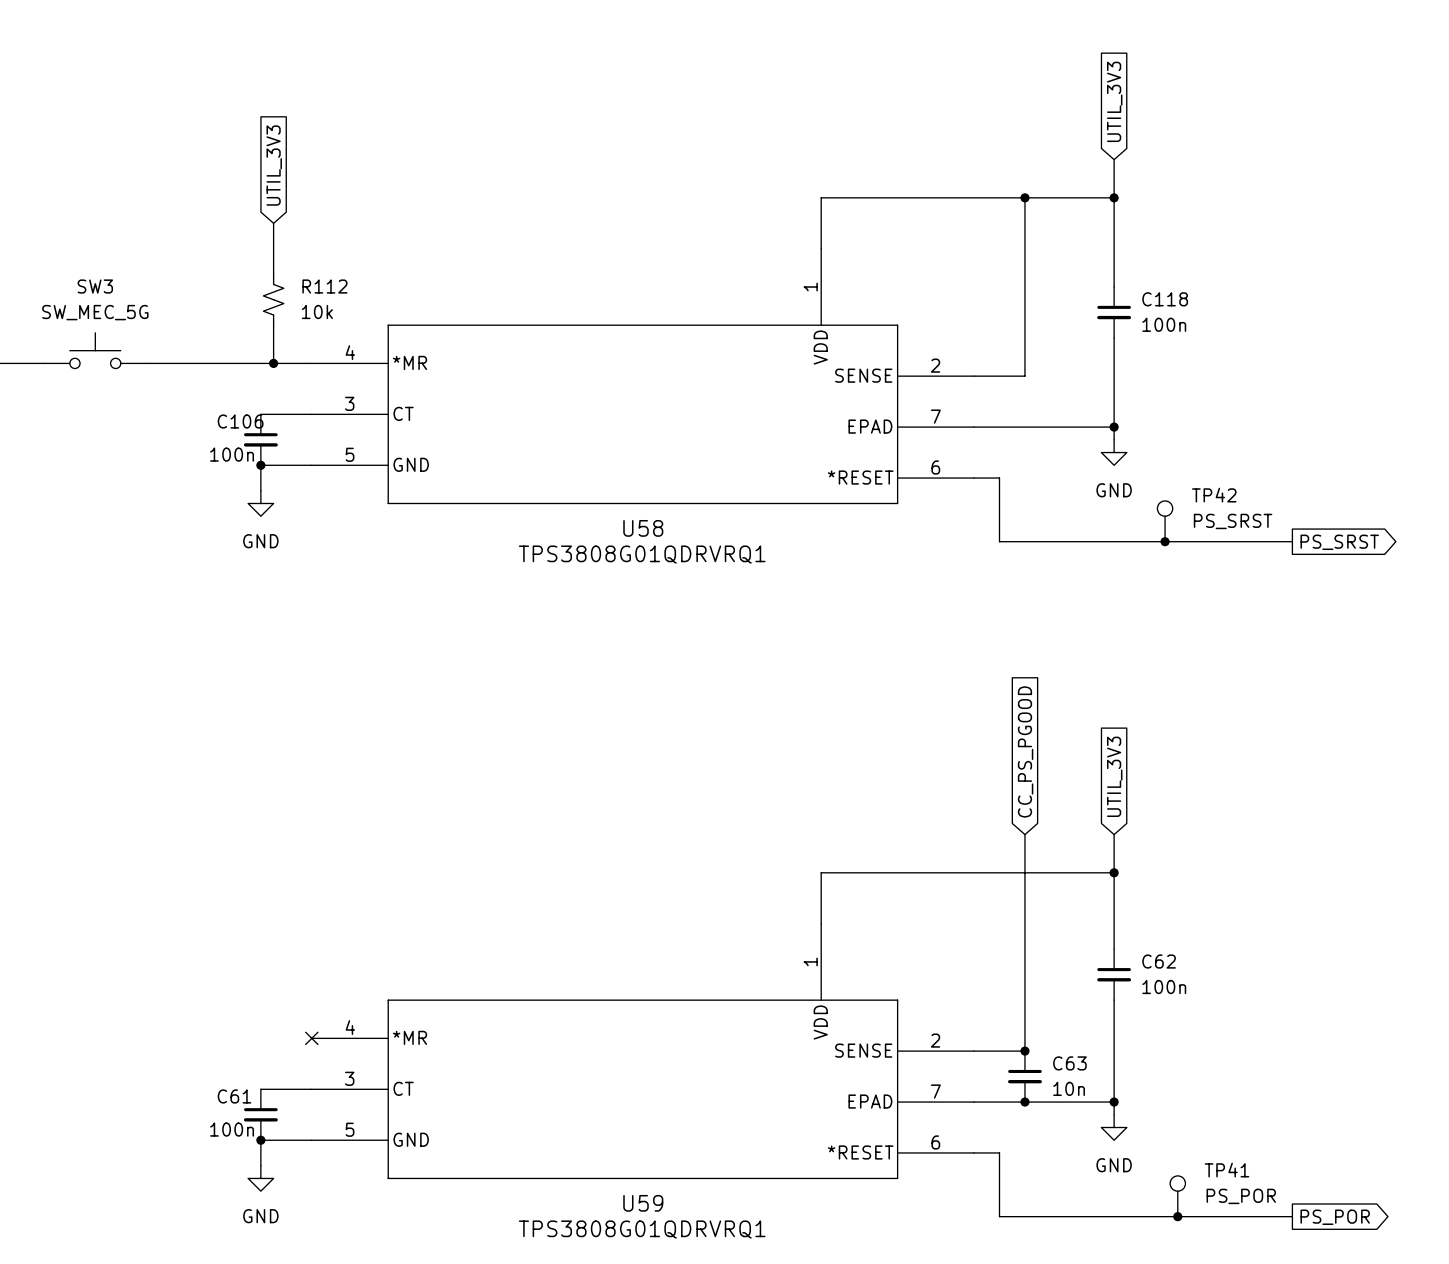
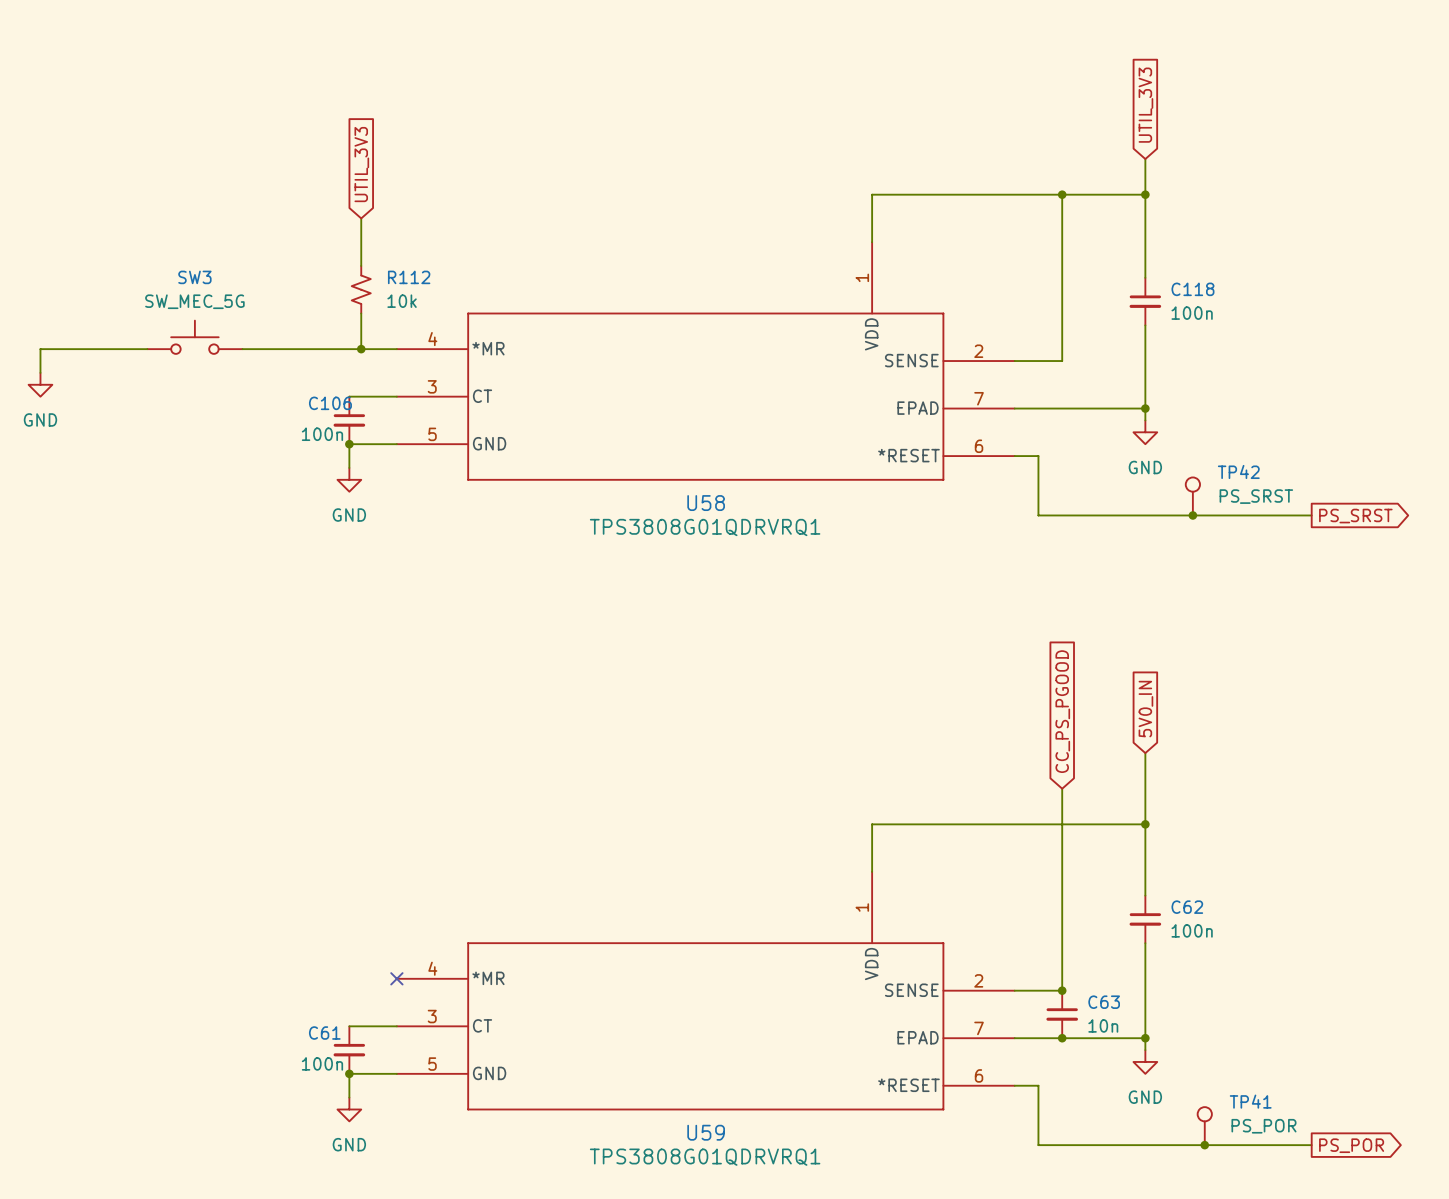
global label: none -> 5V0_IN (1145, 709)
global label: UTIL_3V3 (1114, 776) -> none
wire: none -> (1145, 753) (1145, 788)

